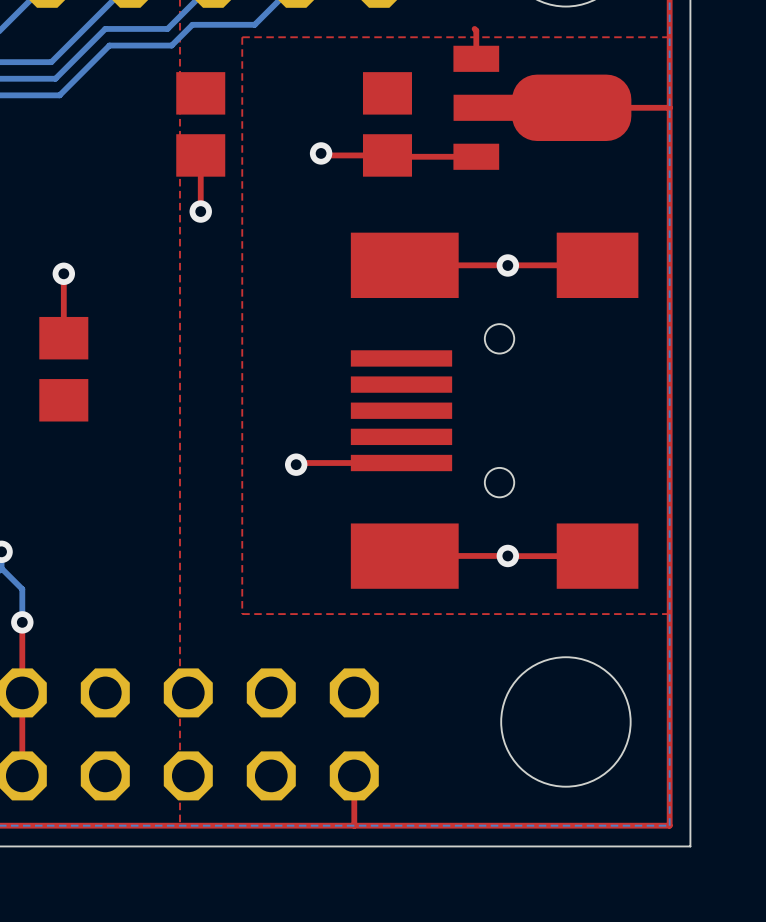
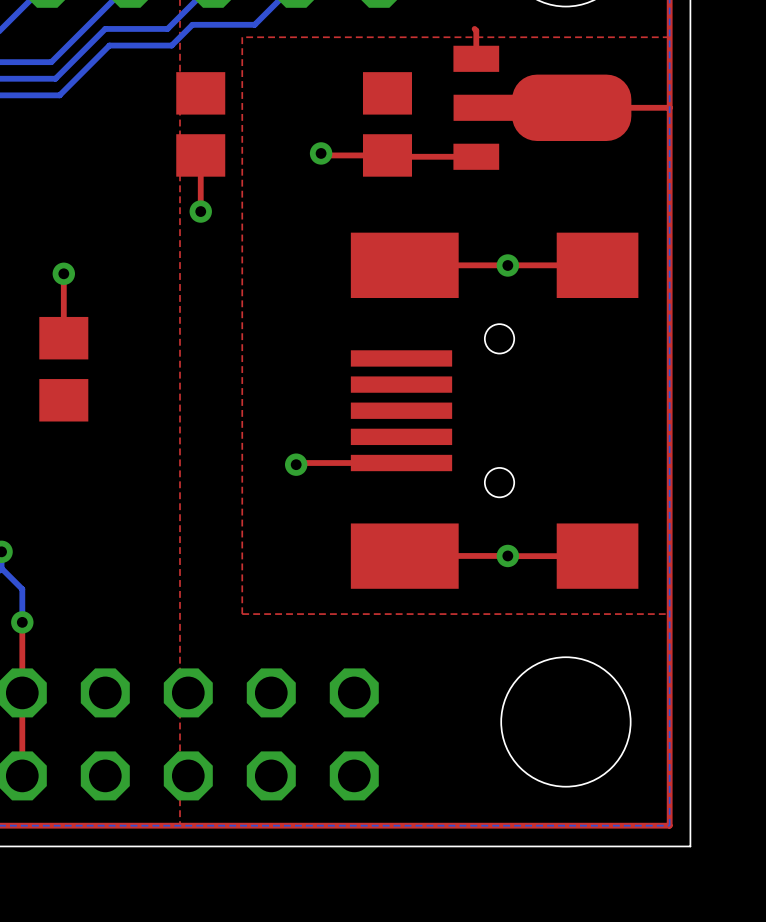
top track: (354, 775) (354, 825) -> none

